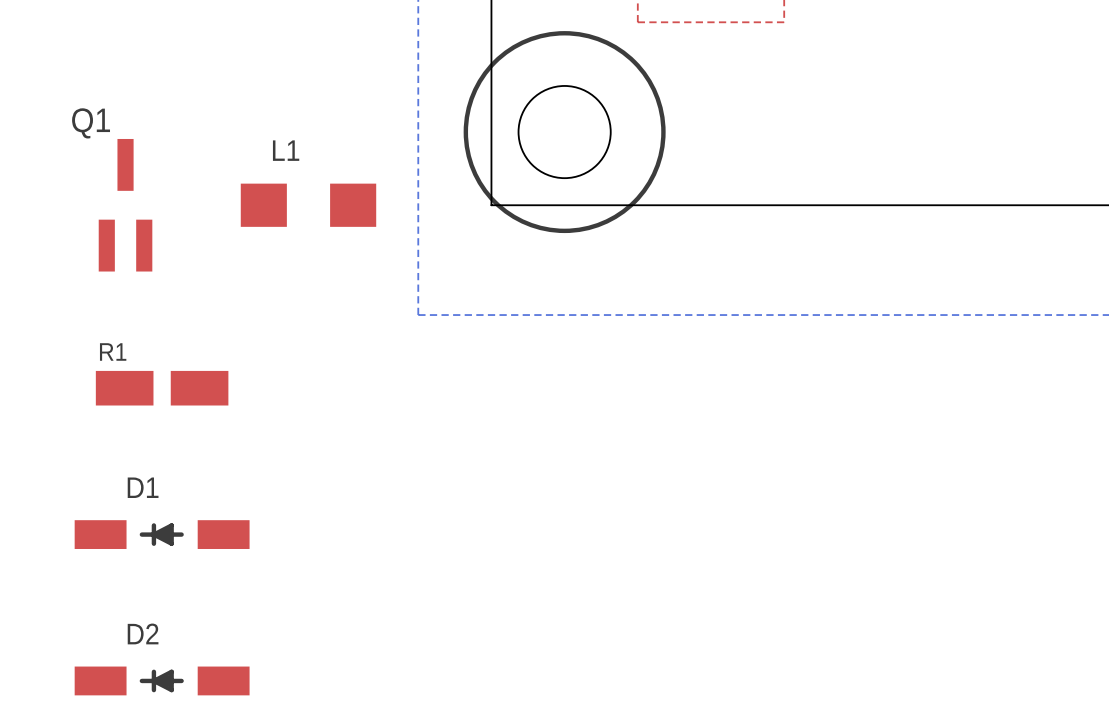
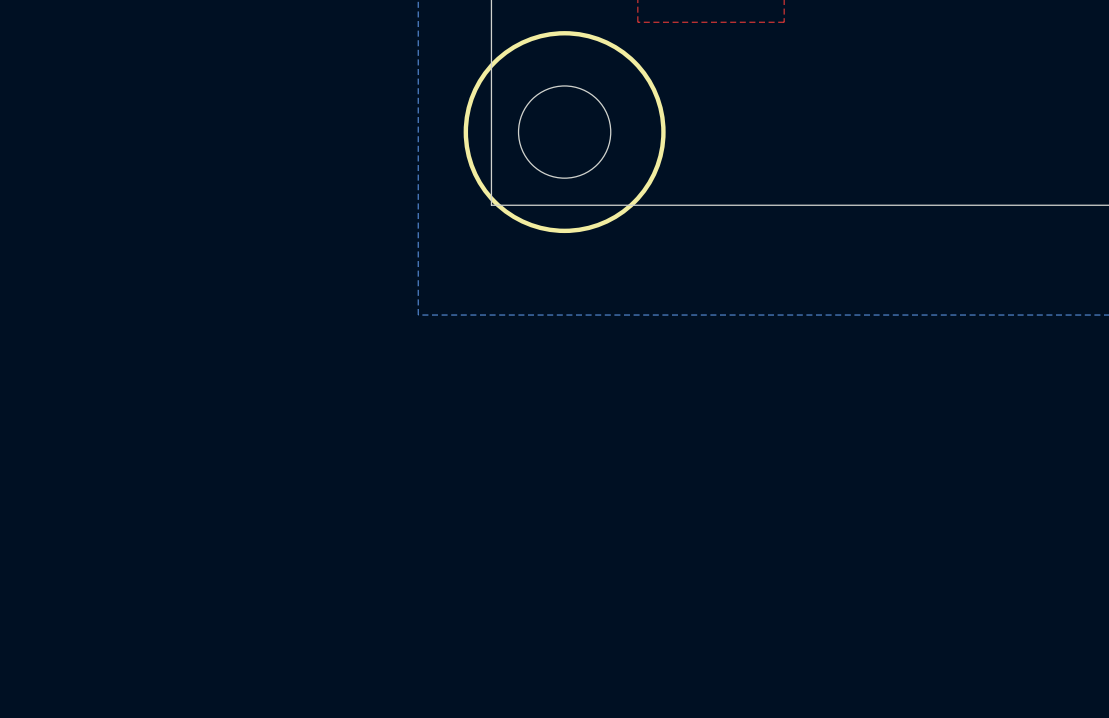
Q1: (125, 205) -> none
L1: (308, 205) -> none
R1: (162, 388) -> none
D1: (162, 534) -> none
D2: (162, 680) -> none

